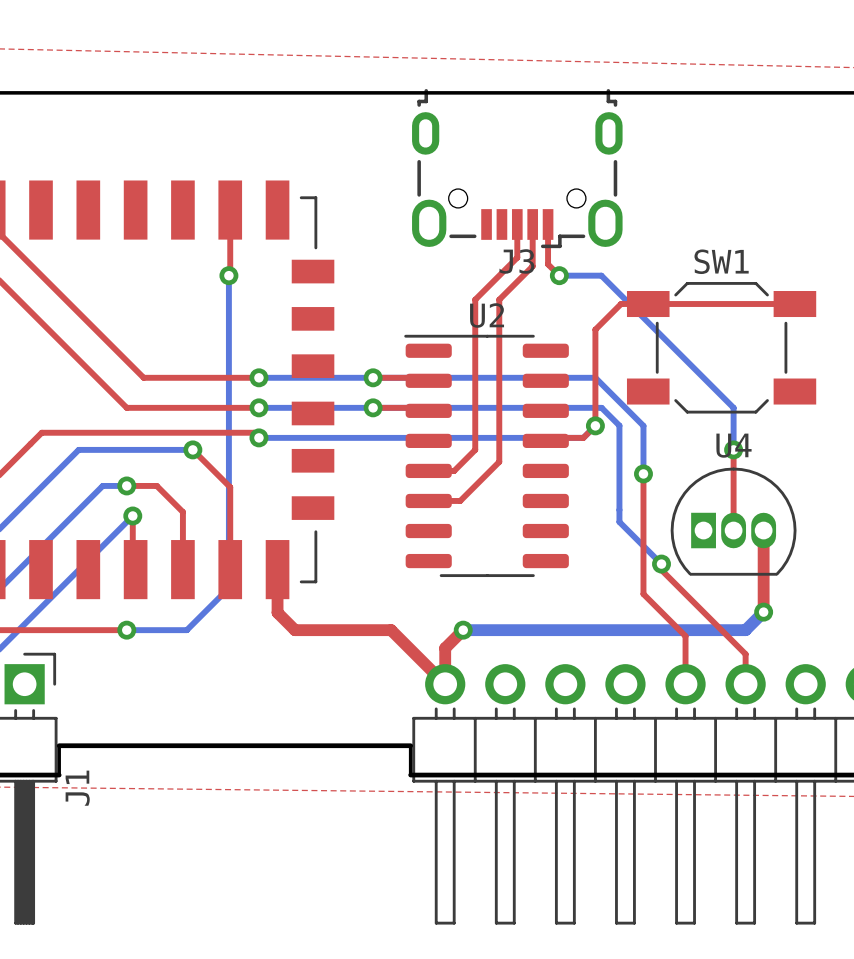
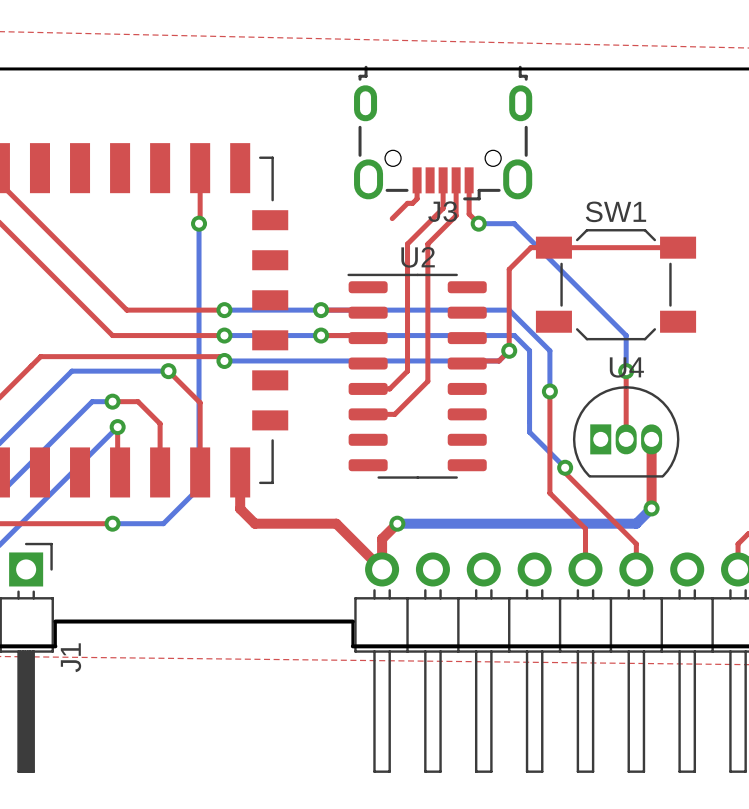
top track: none -> (417, 180) (417, 198) (412, 203) (407, 203) (392, 218)

